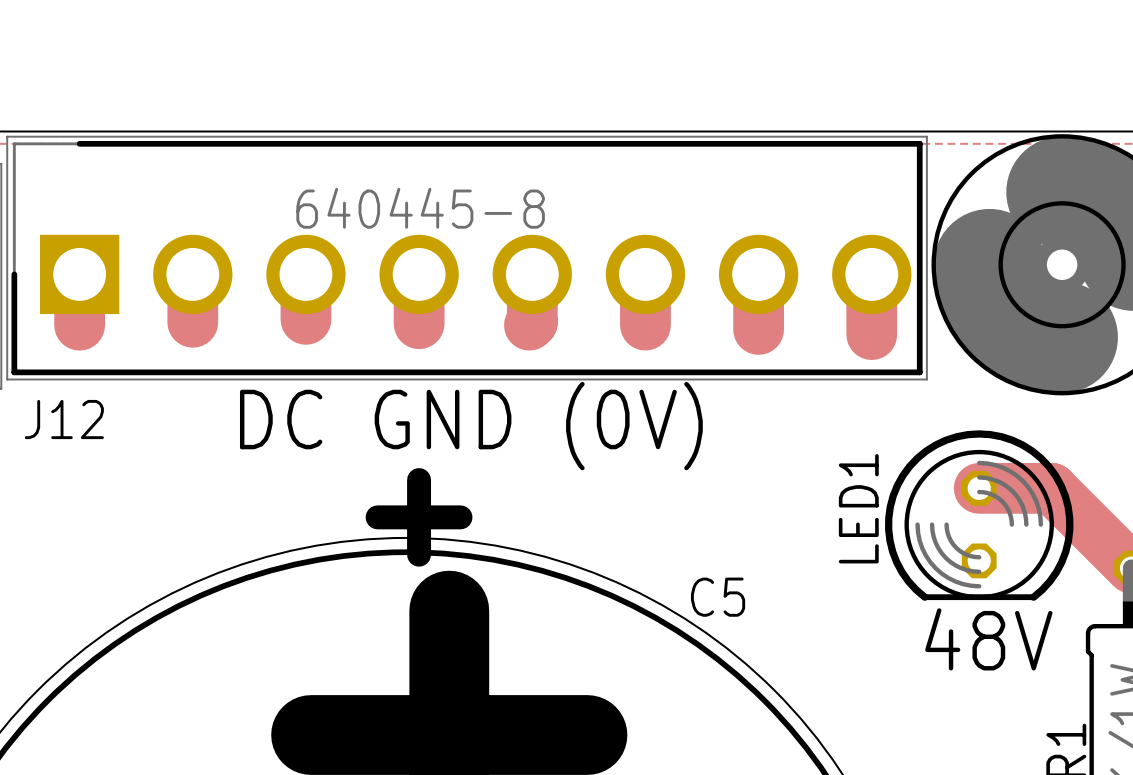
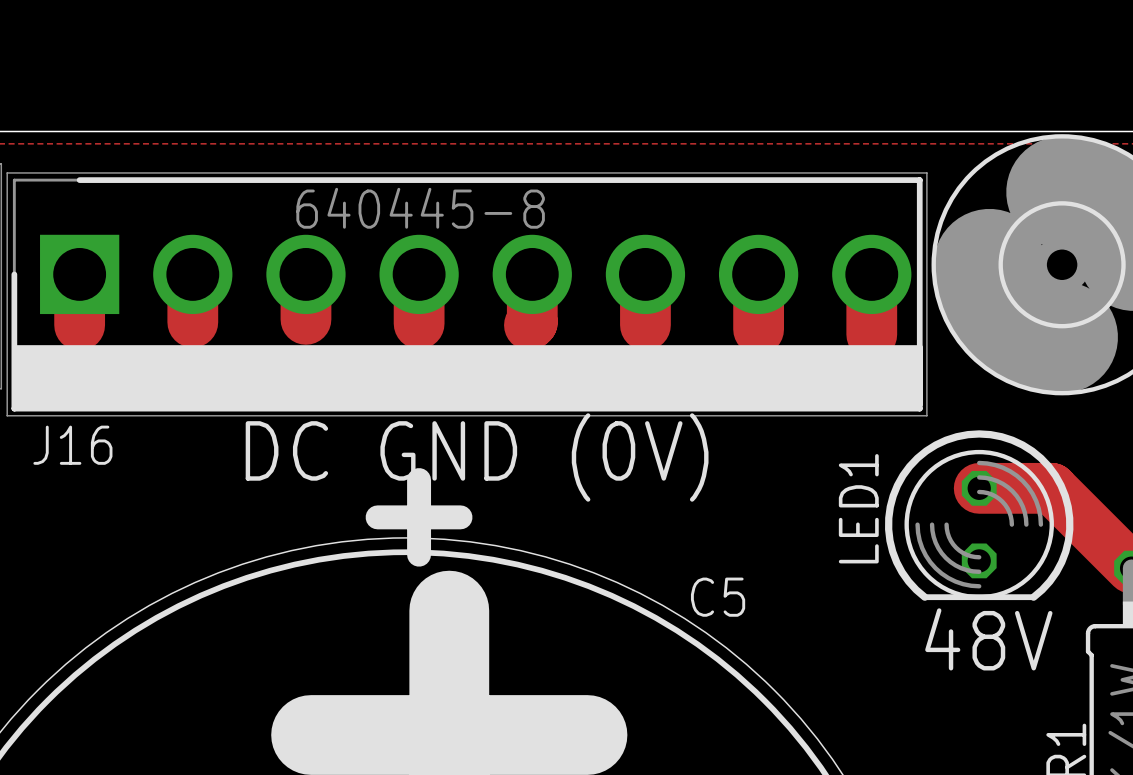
J12: 640445-8 (467, 258) -> none
J16: none -> 640445-8 (467, 294)
text position: DC GND (0V) (471, 426) -> DC GND (0V) (477, 457)

